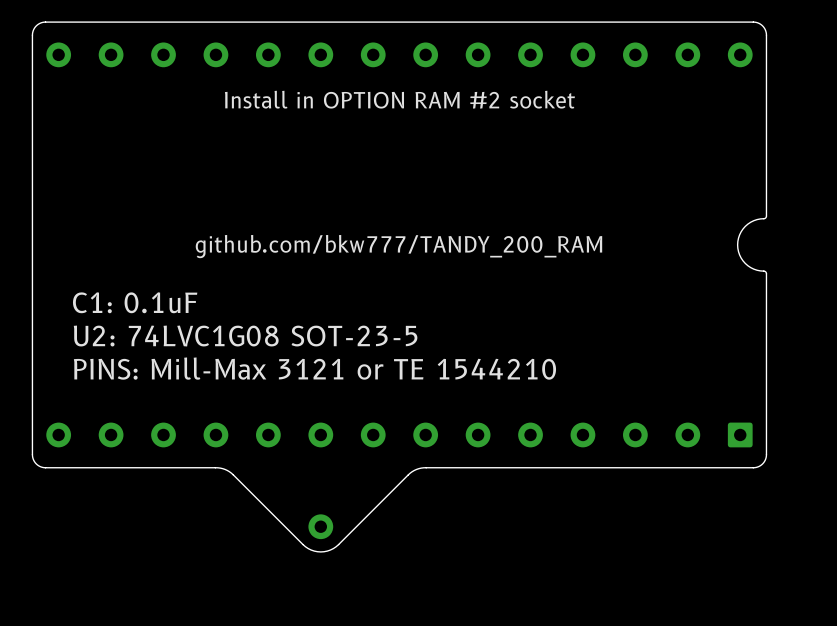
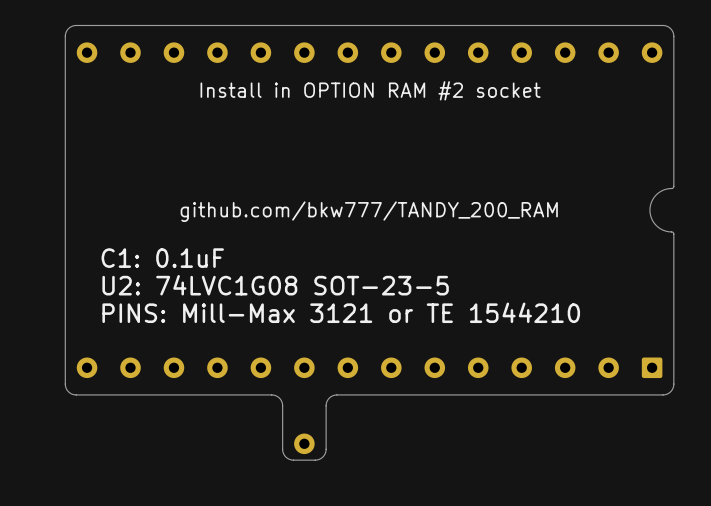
board edge: (426, 467) (410, 473) (338, 544) (330, 550) (320, 551) (311, 550) (302, 544) (231, 473) (215, 467) -> (391, 394) (336, 394) (330, 397) (326, 404) (325, 451) (322, 457) (315, 460) (292, 460) (284, 455) (282, 404) (277, 396) (271, 394) (217, 394)

